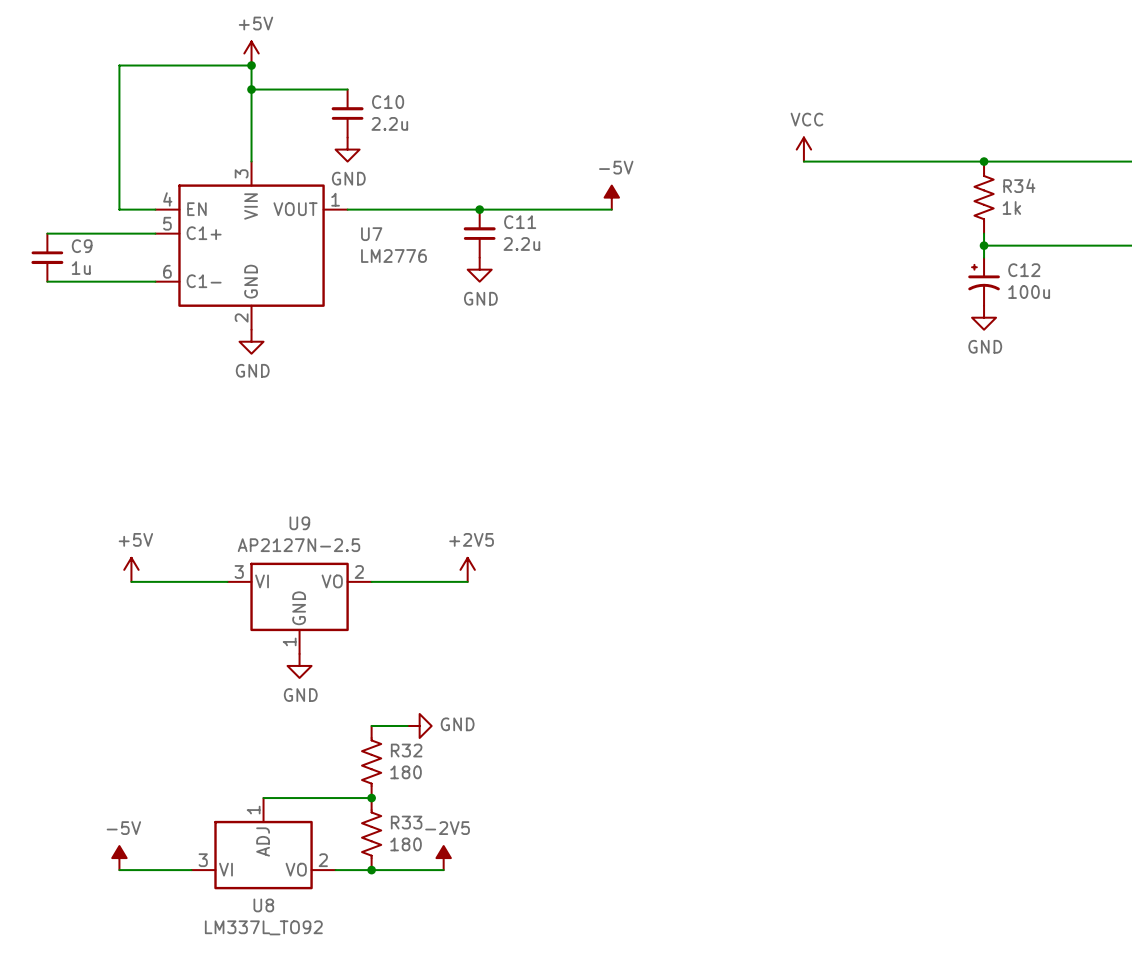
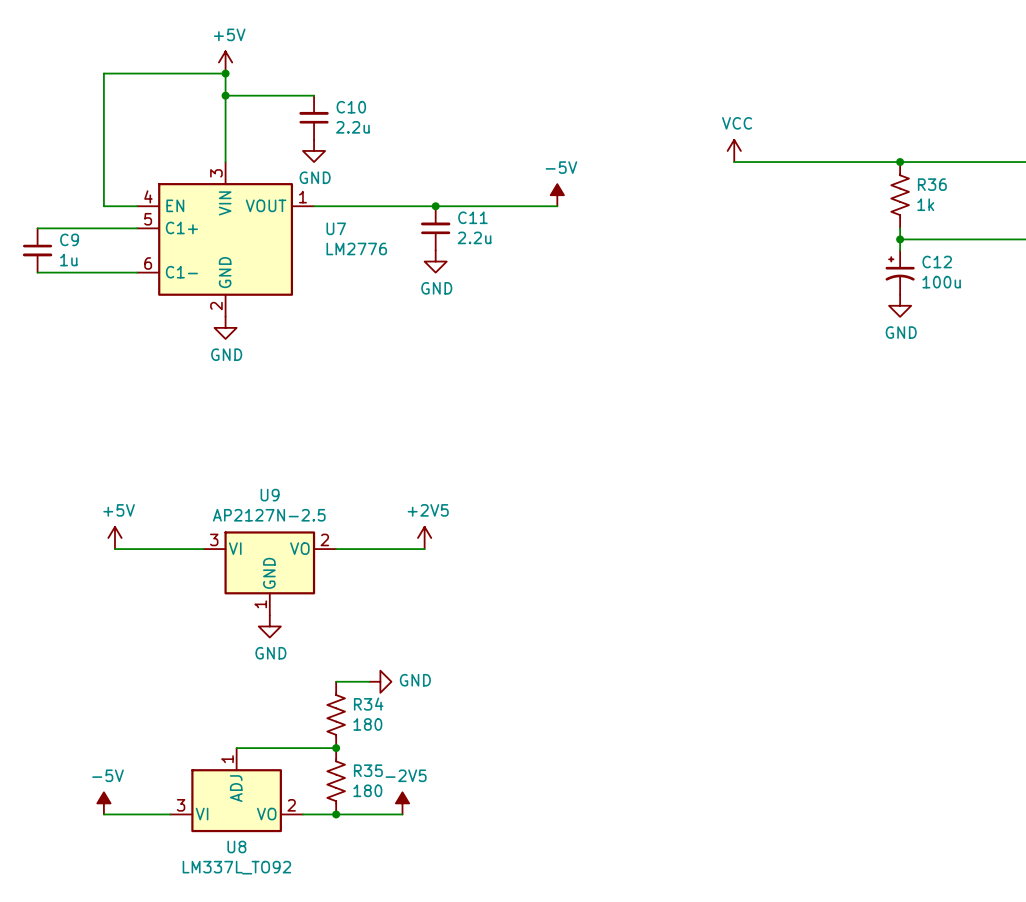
R34 name: R34 (1019, 185) -> R36 (932, 184)
R32 name: R32 (406, 750) -> R34 (368, 704)
R33 name: R33 (406, 822) -> R35 (368, 770)

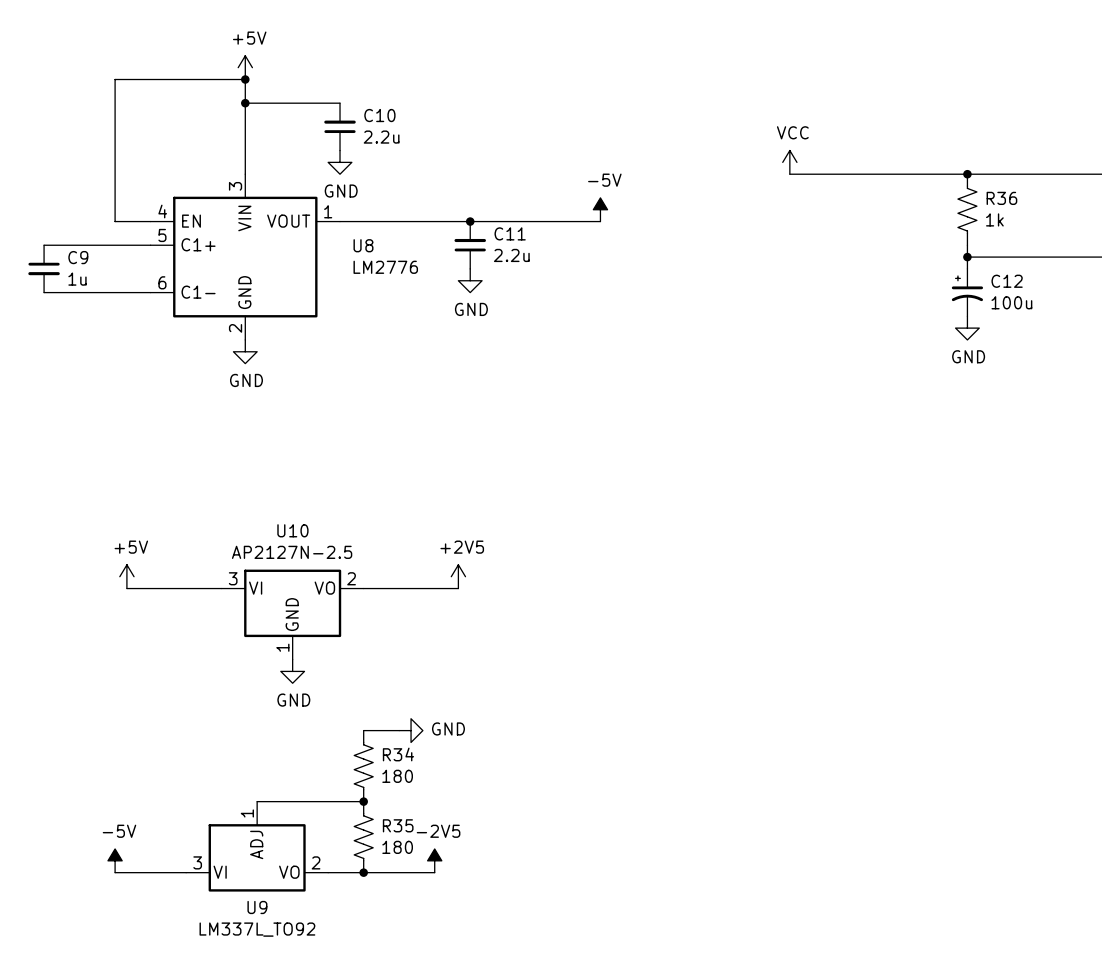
U7 name: U7 (336, 228) -> U8 (363, 245)
U9 name: U9 (270, 495) -> U10 (292, 530)
U8 name: U8 (236, 847) -> U9 (257, 907)

